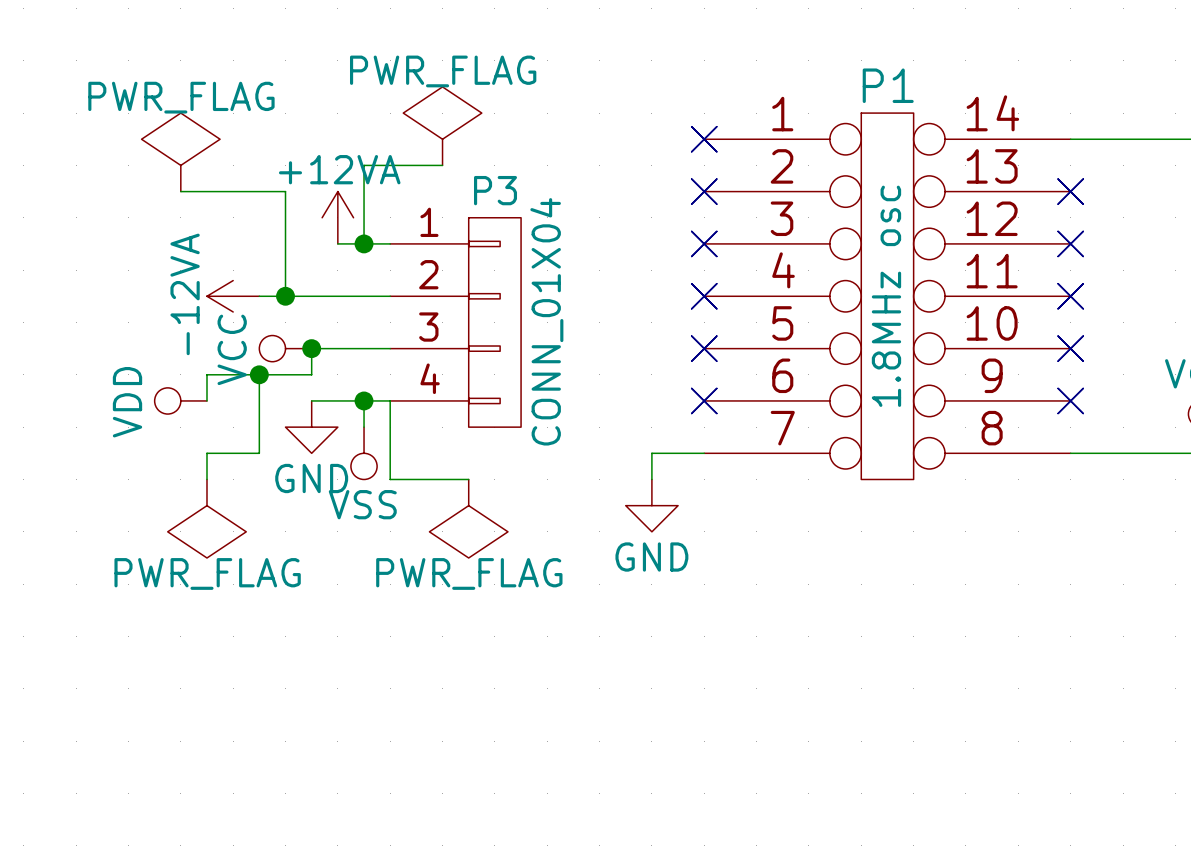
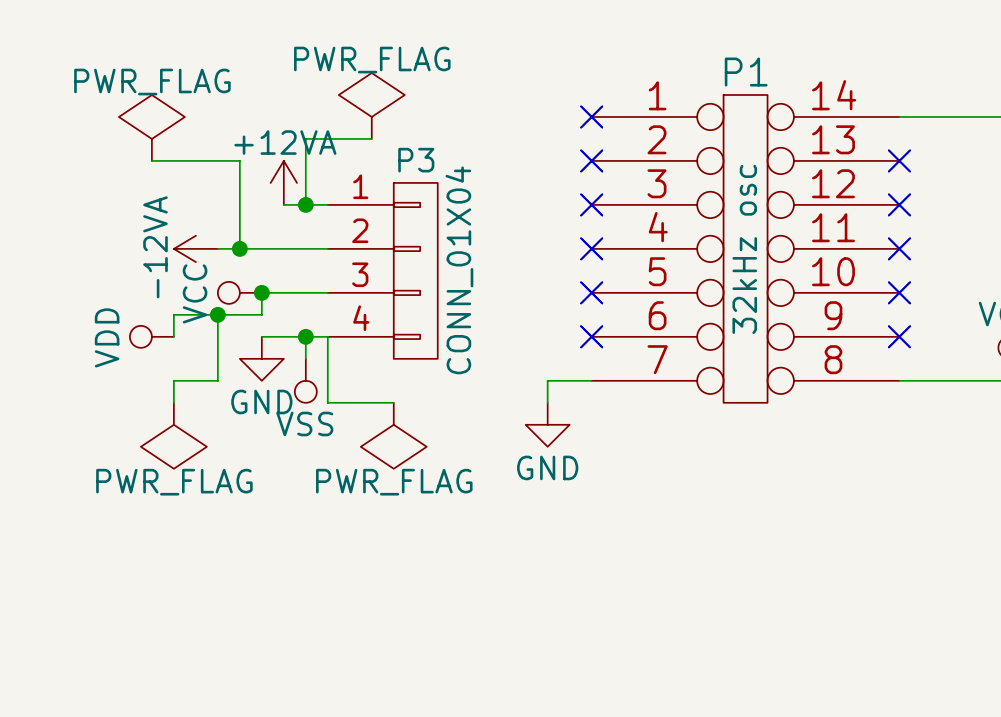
P1 value: 1.8MHz osc (886, 296) -> 32kHz osc (744, 249)

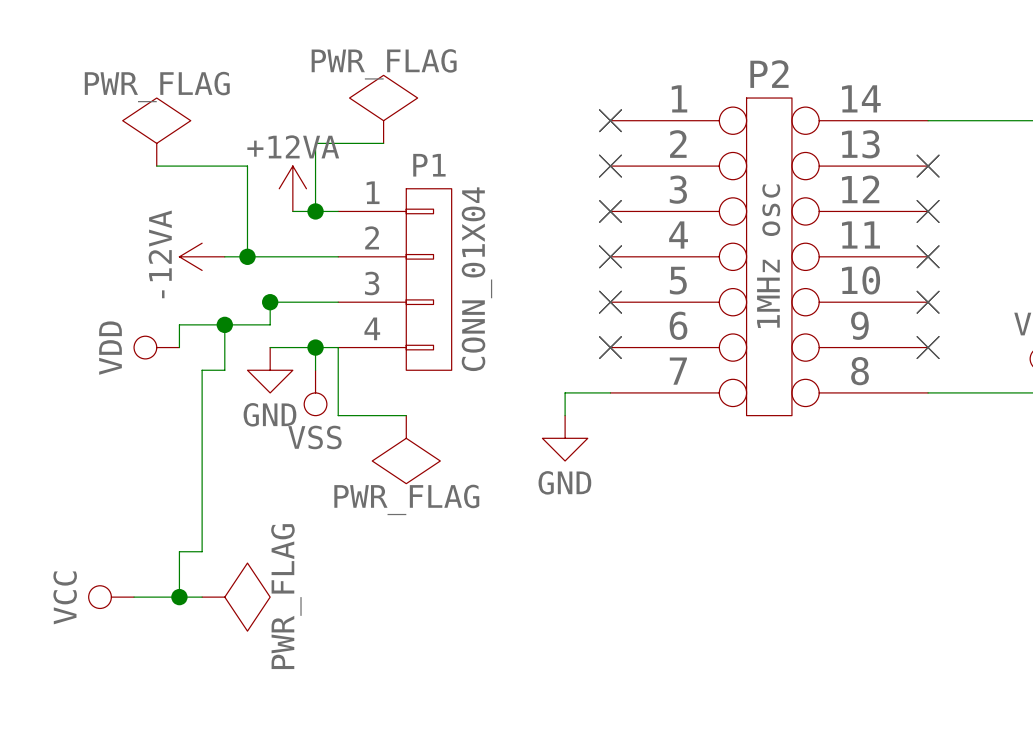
P1 name: P1 (746, 72) -> P2 (769, 74)
P3 name: P3 (416, 160) -> P1 (429, 165)
P1 value: 32kHz osc (744, 249) -> 1MHz osc (768, 256)
power symbol position: VCC (239, 292) -> VCC (111, 597)
wire: (217, 358) (217, 380) (173, 380) (173, 402) -> (224, 370) (202, 370) (202, 551) (179, 551) (179, 597)
power symbol rotation: 0° (173, 435) -> 90° counterclockwise (236, 597)
power symbol position: PWR_FLAG (173, 435) -> PWR_FLAG (236, 597)
wire: none -> (134, 597) (202, 597)
junction: none -> (179, 597)

